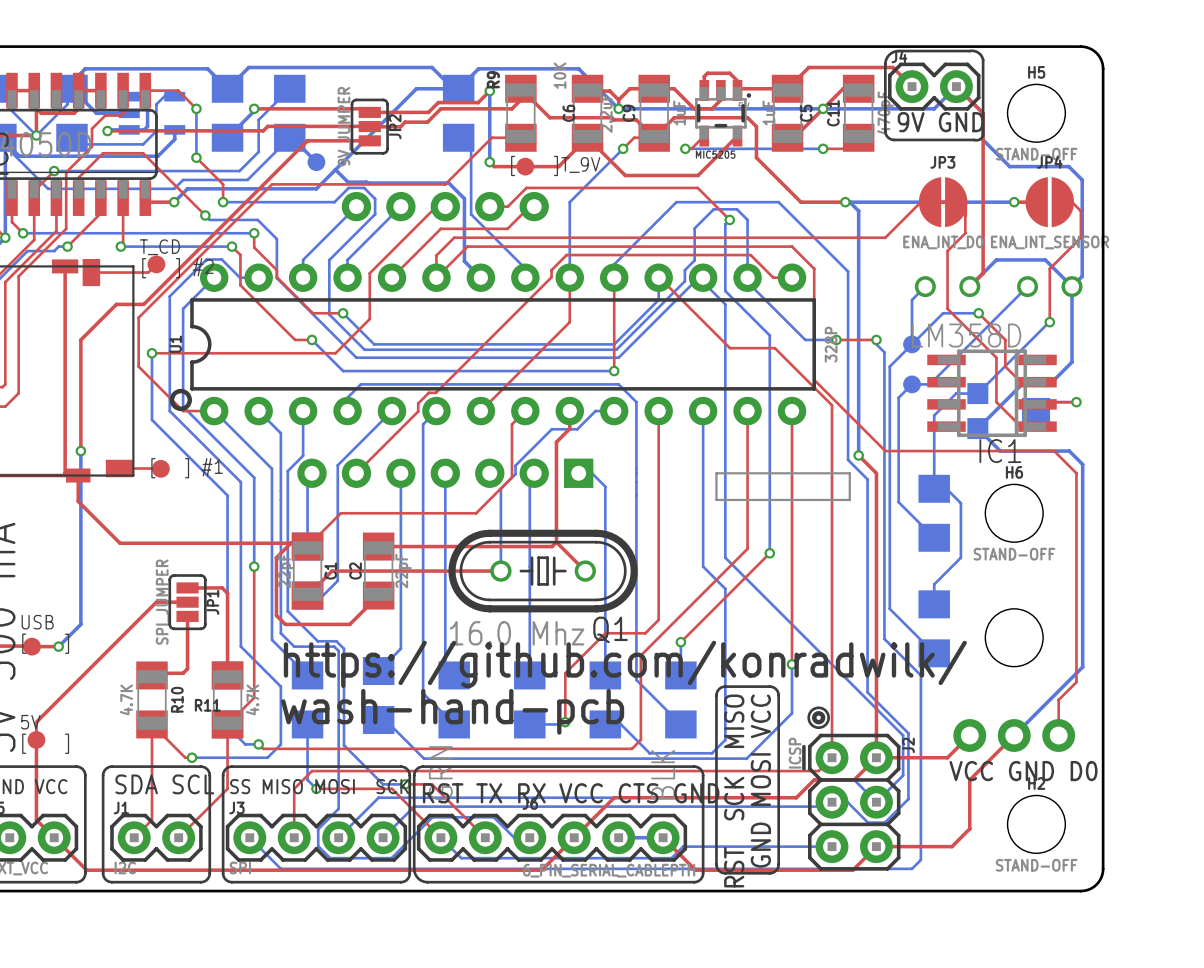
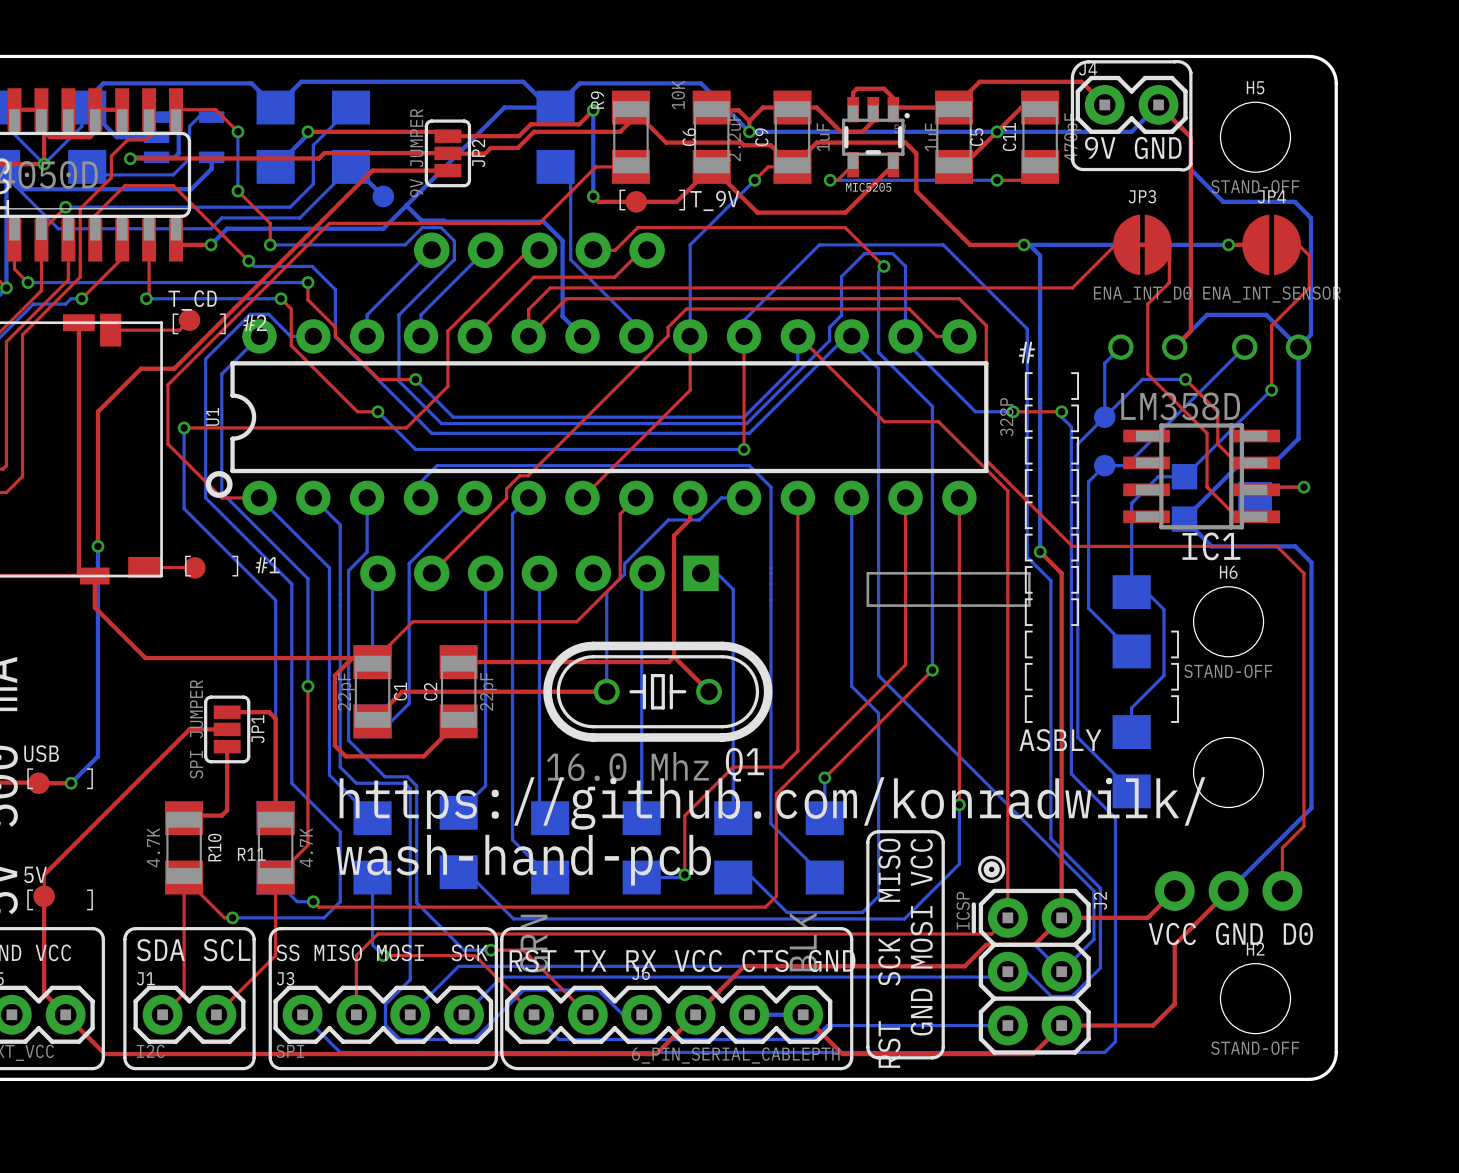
text: none -> # (1026, 352)
text: none -> [ ] (1051, 386)
text: none -> [ ] (1051, 418)
text: none -> [ ] (1051, 450)
text: none -> [ ] (1051, 482)
text: none -> [ ] (1051, 515)
text: none -> [ ] (1051, 547)
text: none -> [ ] (1051, 579)
text: none -> [ ] (1051, 612)
text: none -> [ ] (1101, 644)
text: none -> [ ] (1101, 676)
text: none -> [ ] (1101, 709)
text: none -> ASBLY (1060, 740)

